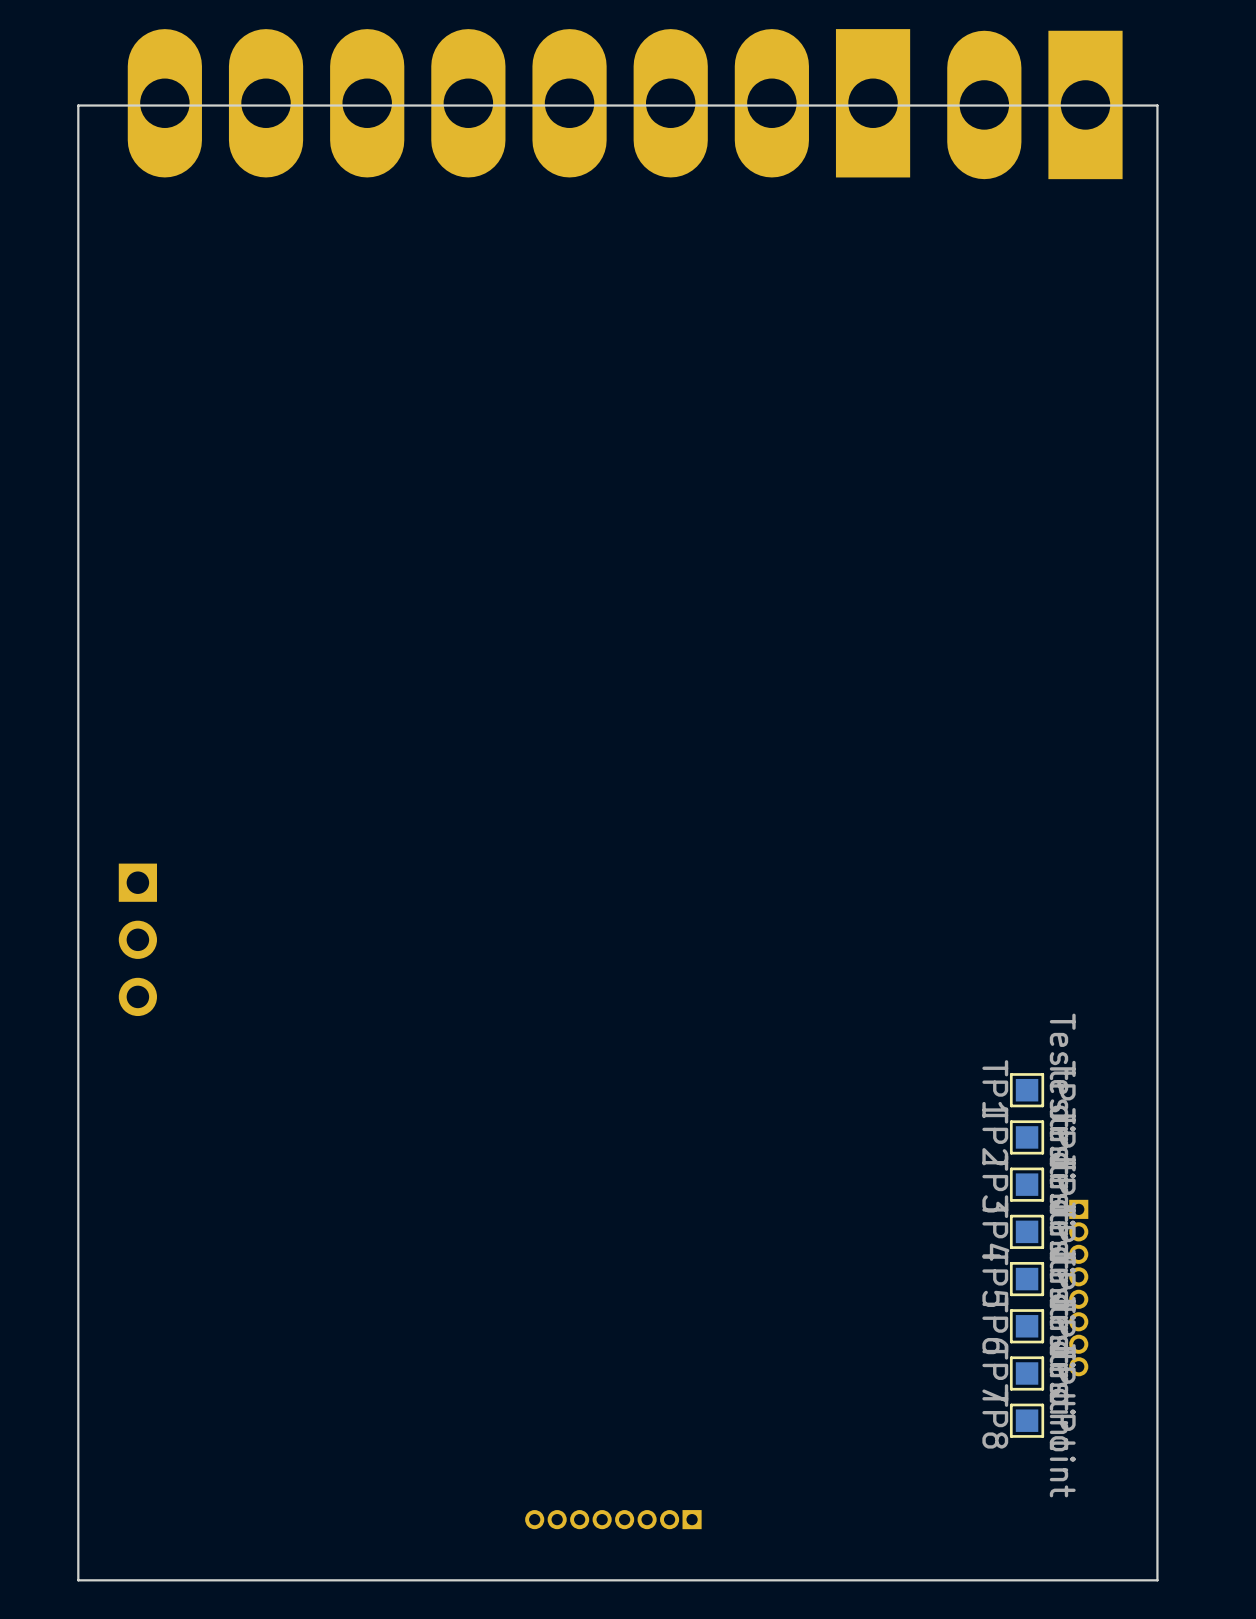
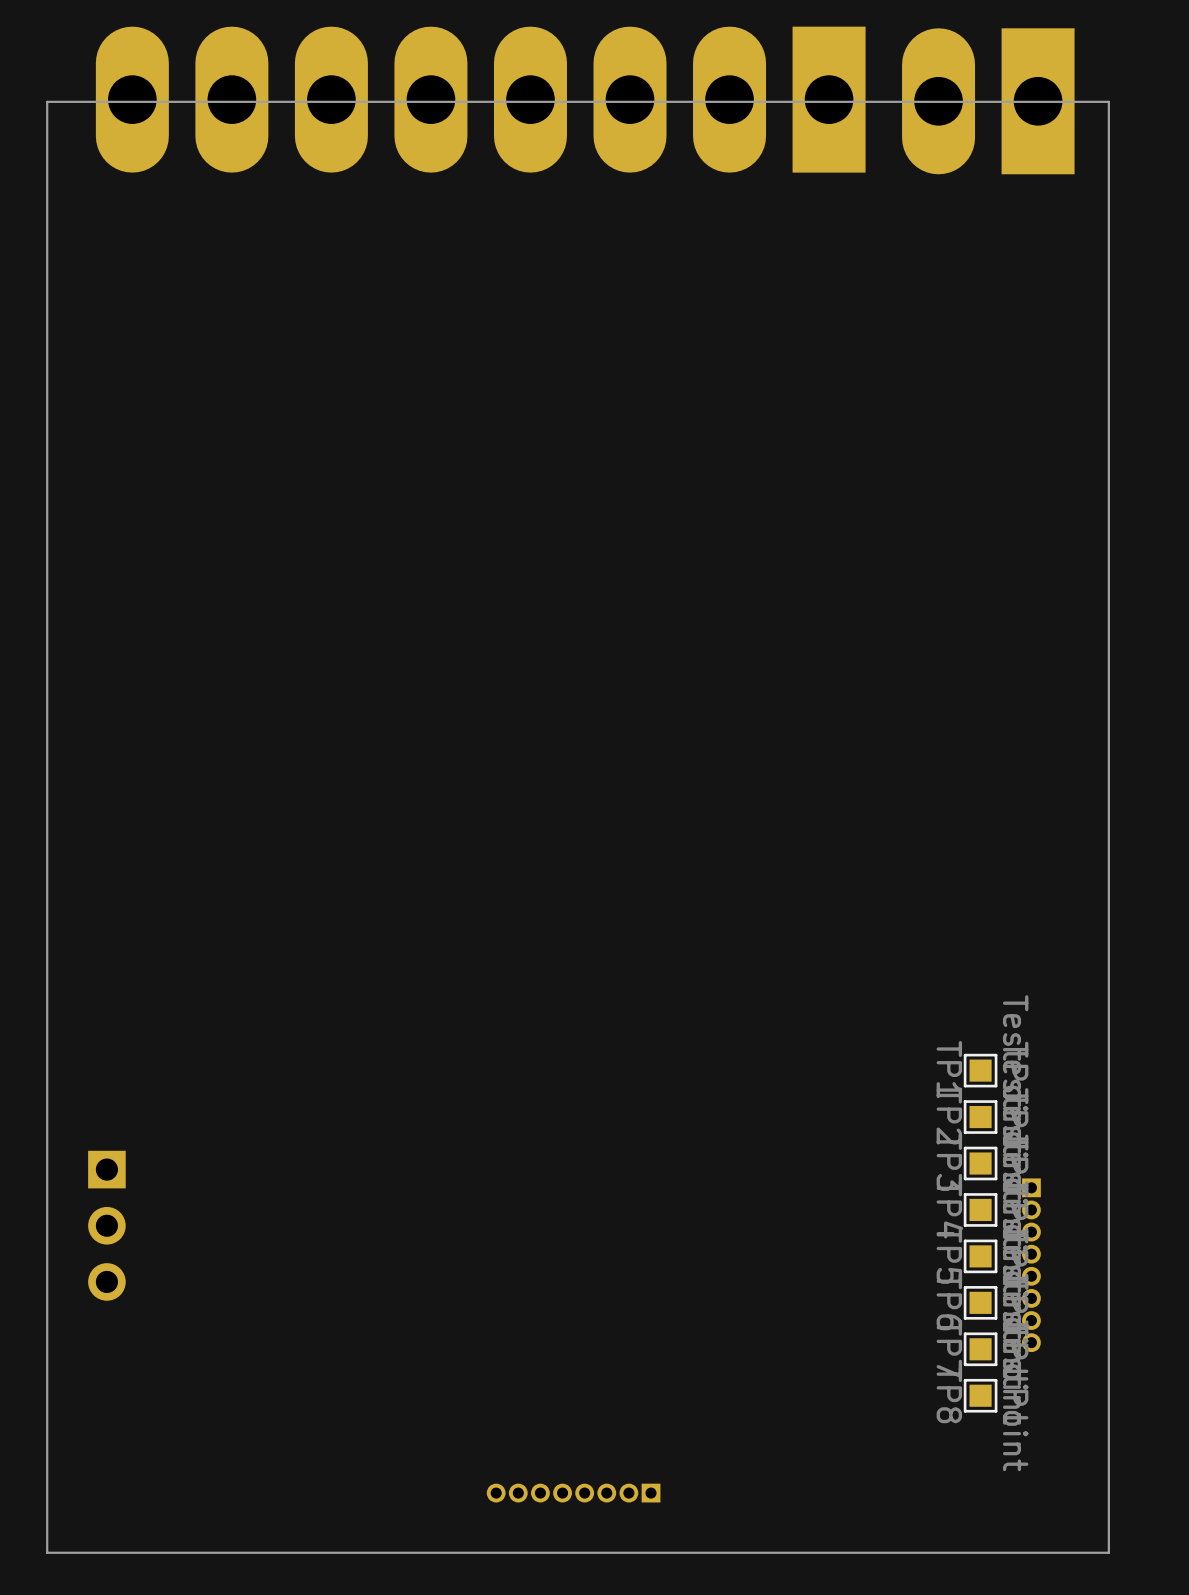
part position: (137, 939) -> (106, 1225)

